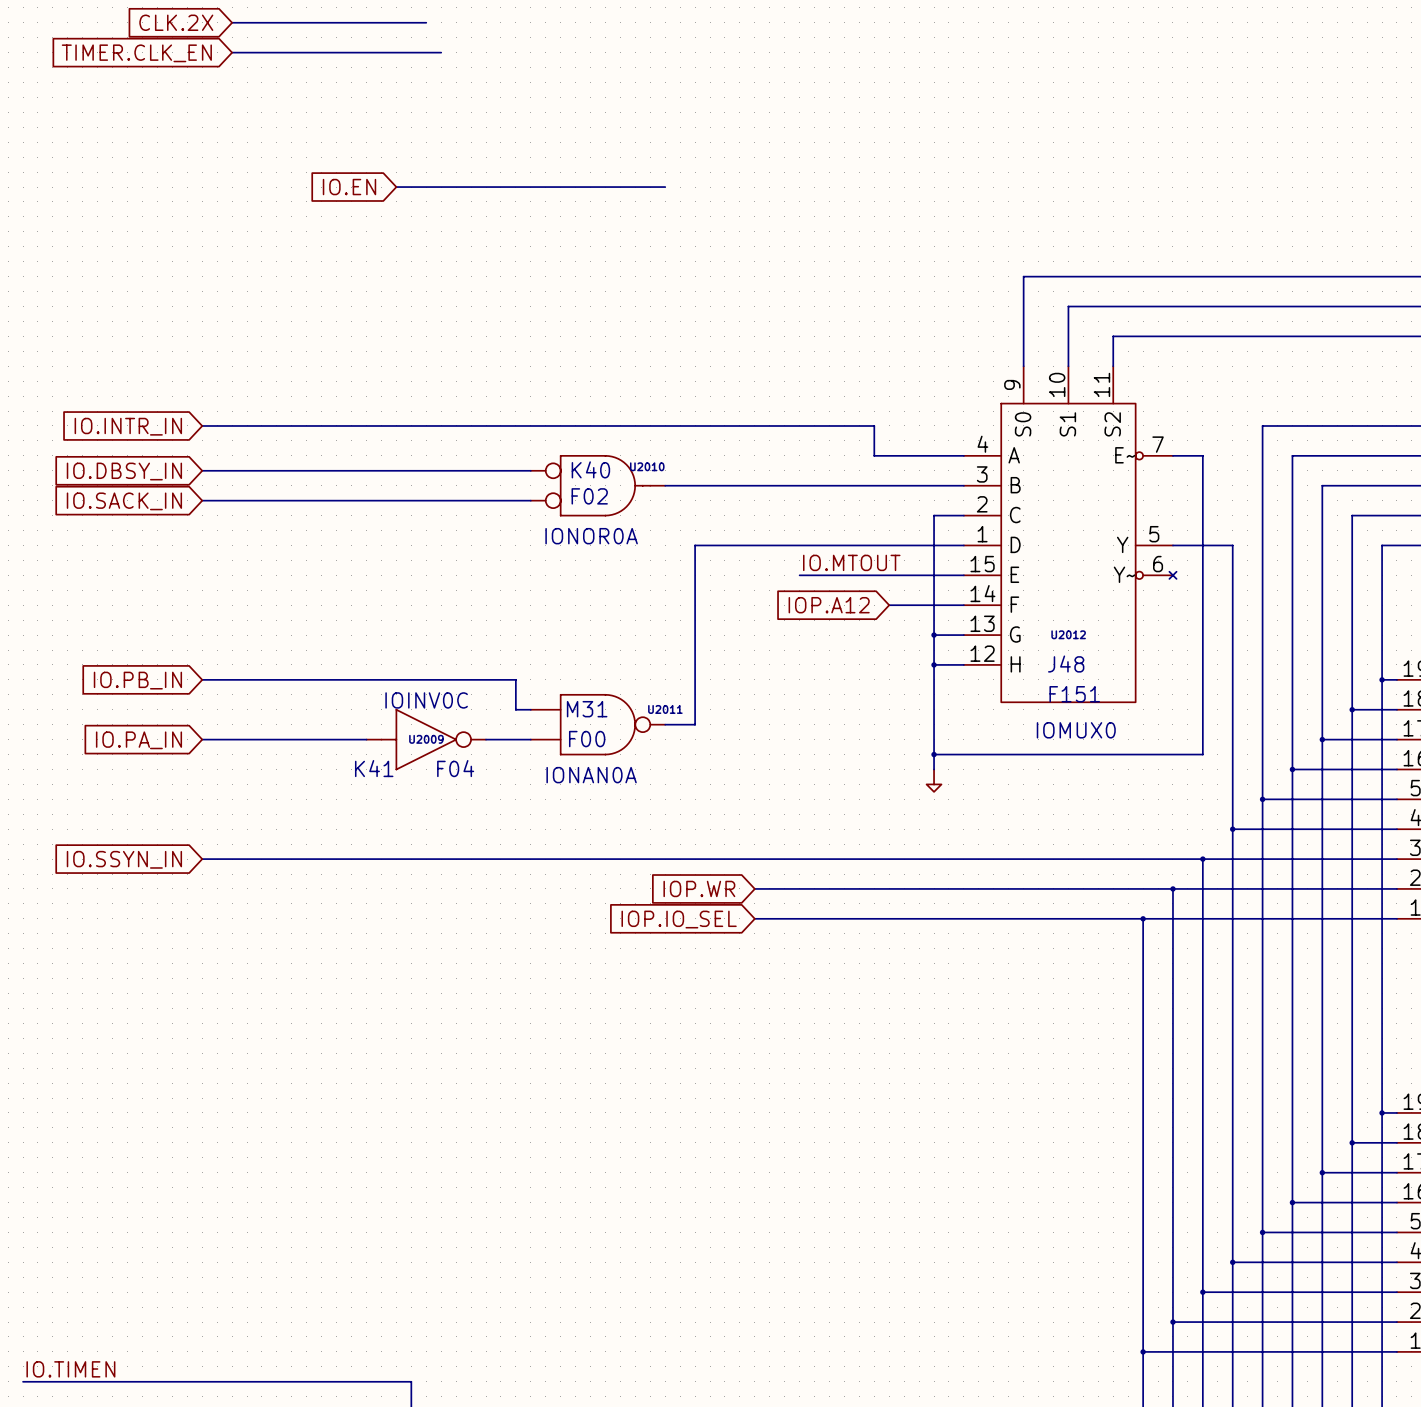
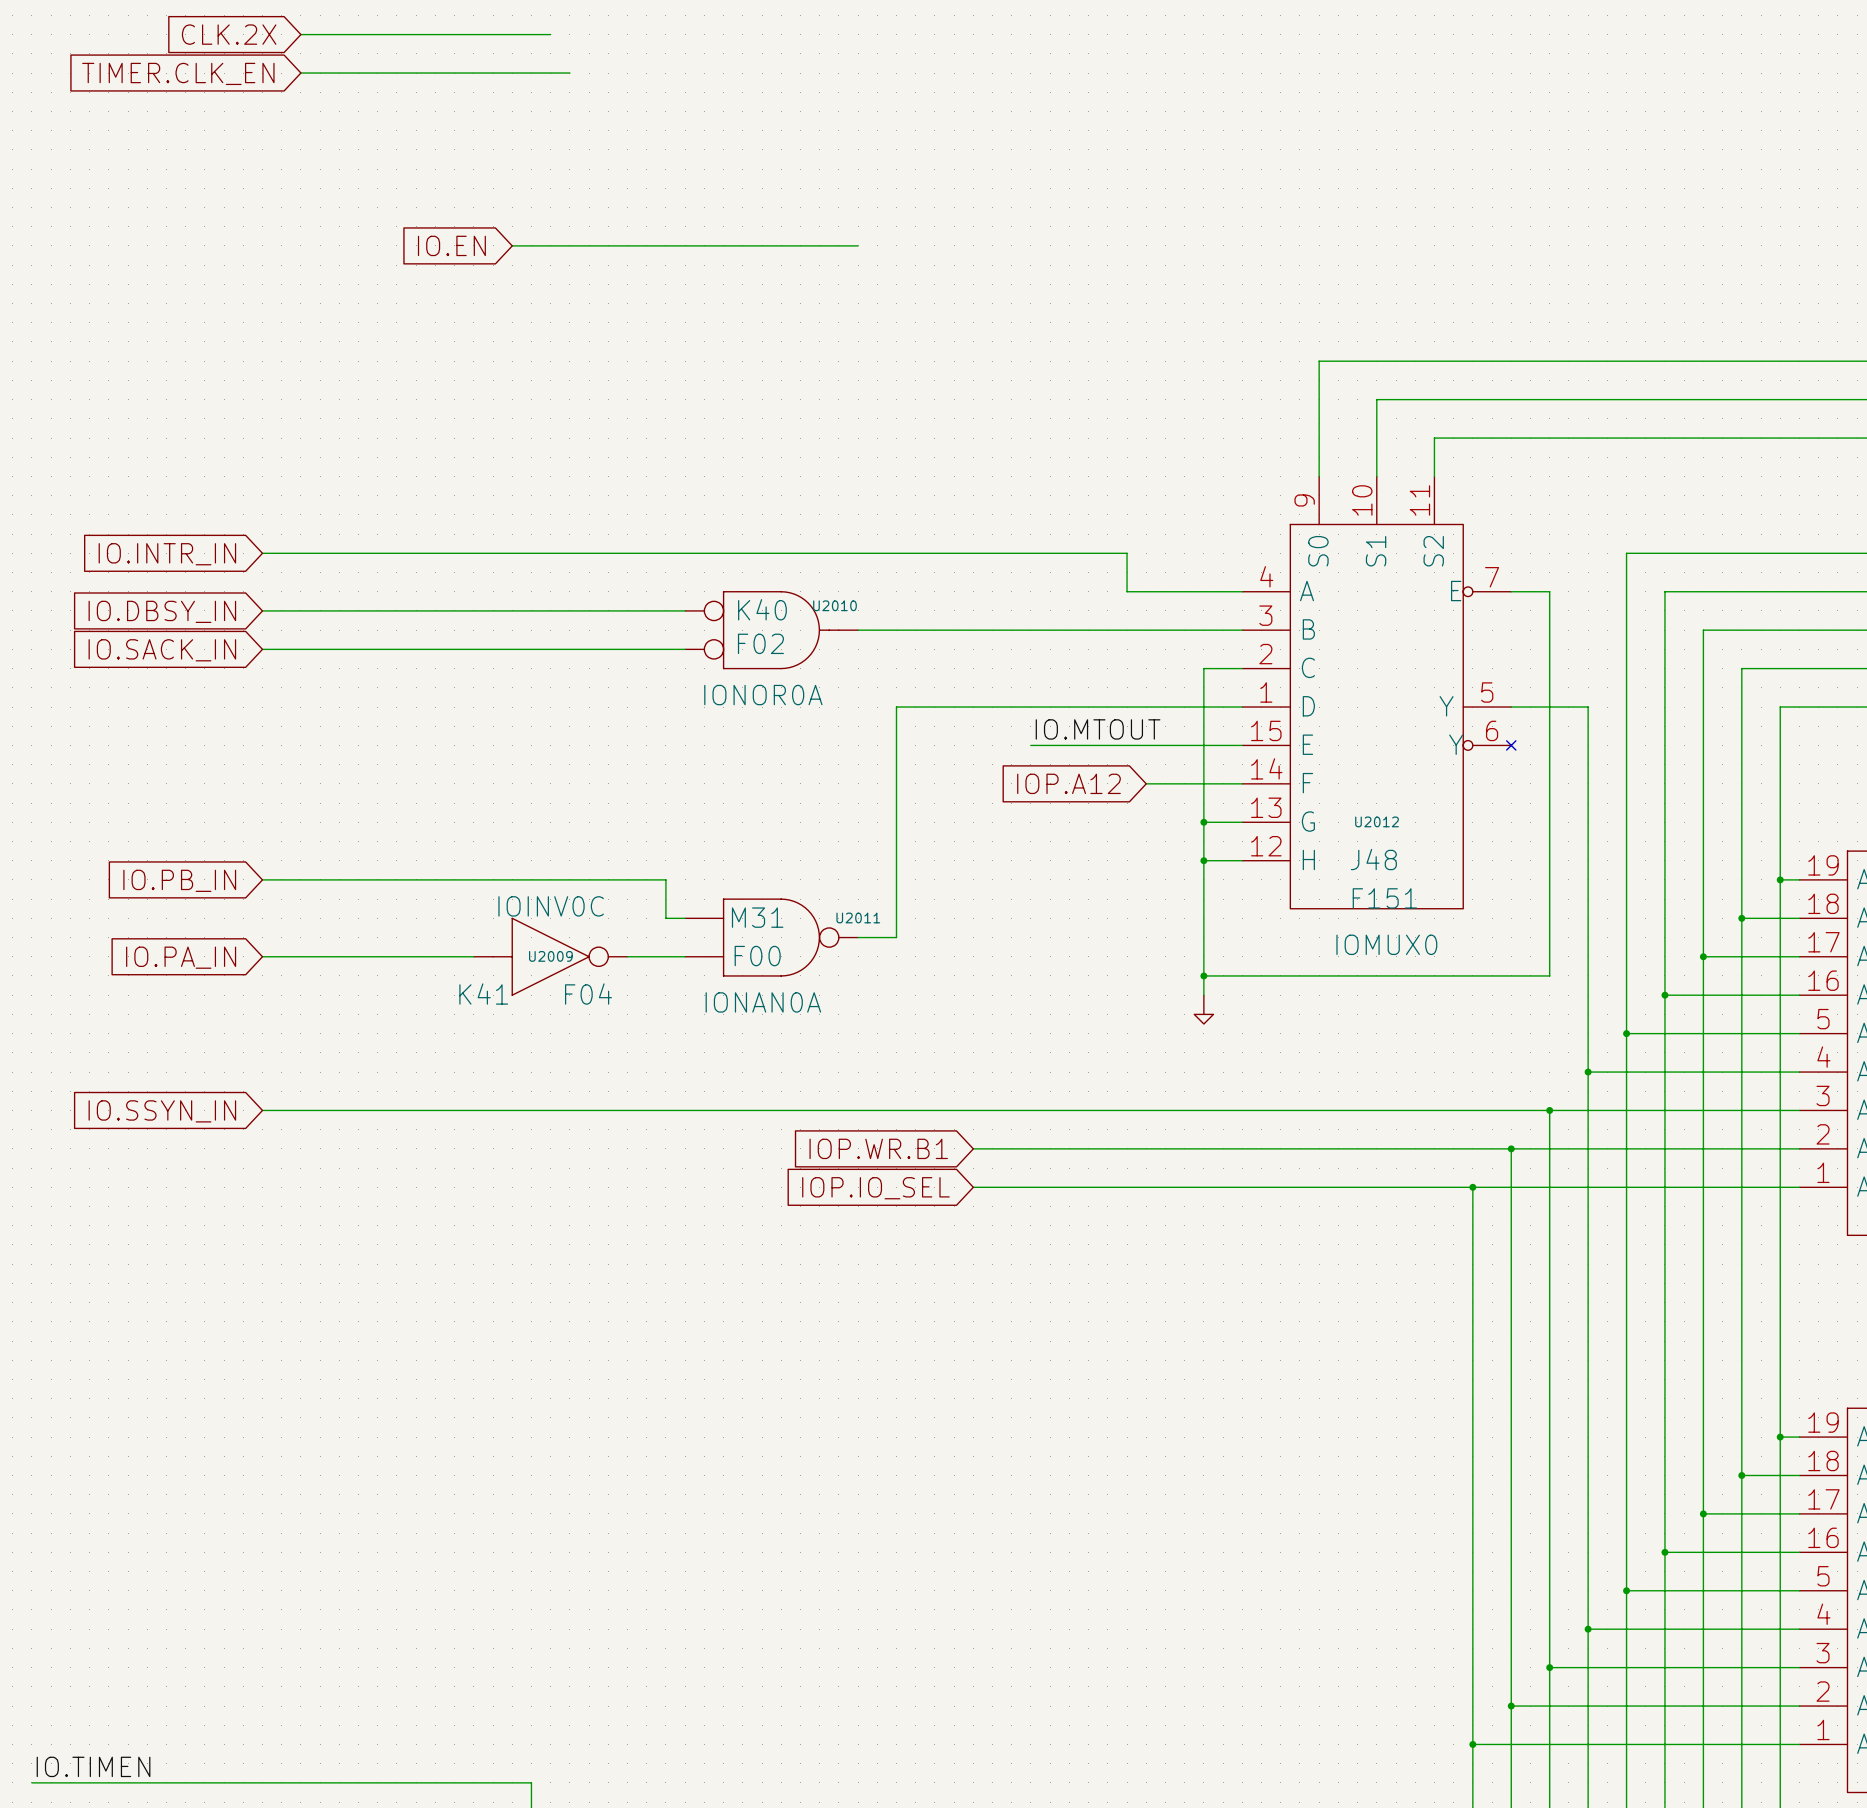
U2012 pin name: E~ (1125, 455) -> E (1456, 591)
U2012 pin name: Y~ (1124, 574) -> Y (1456, 744)
global label: IOP.WR (699, 888) -> IOP.WR.B1 (878, 1148)

